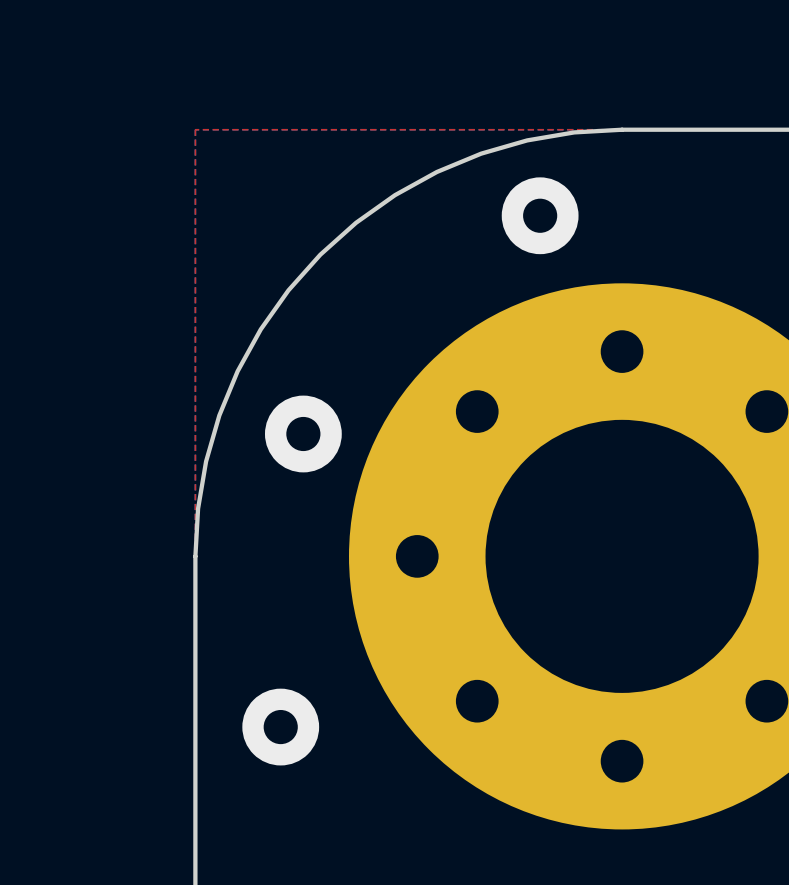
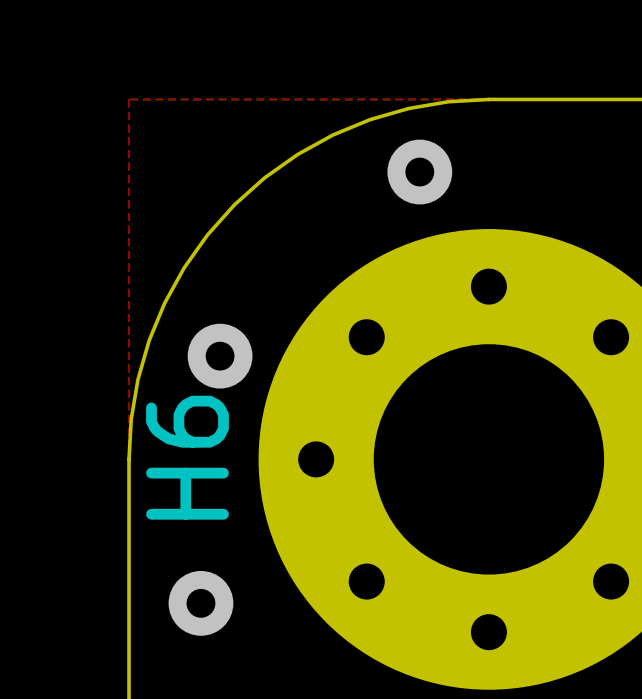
H6 name: none -> H6 (187, 457)

